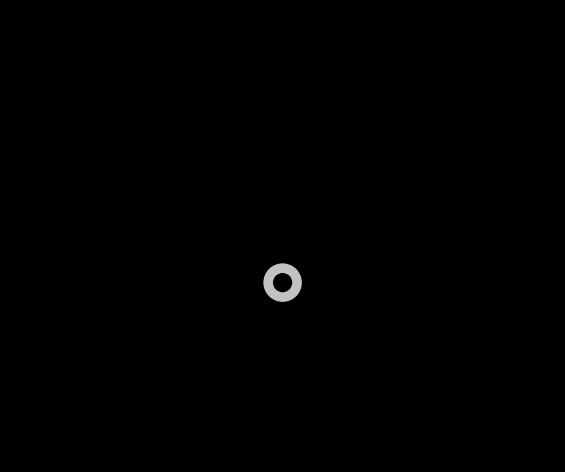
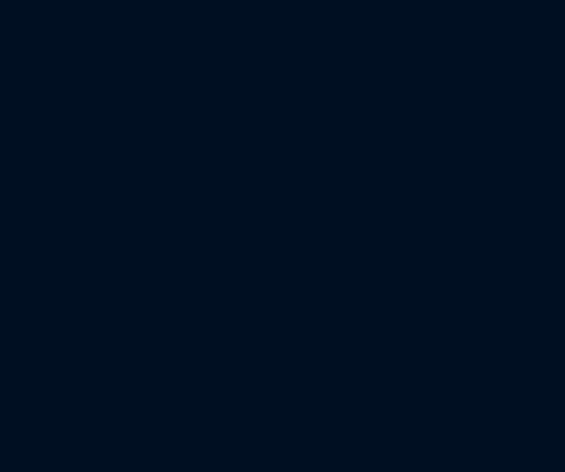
via: (282, 282) -> none

